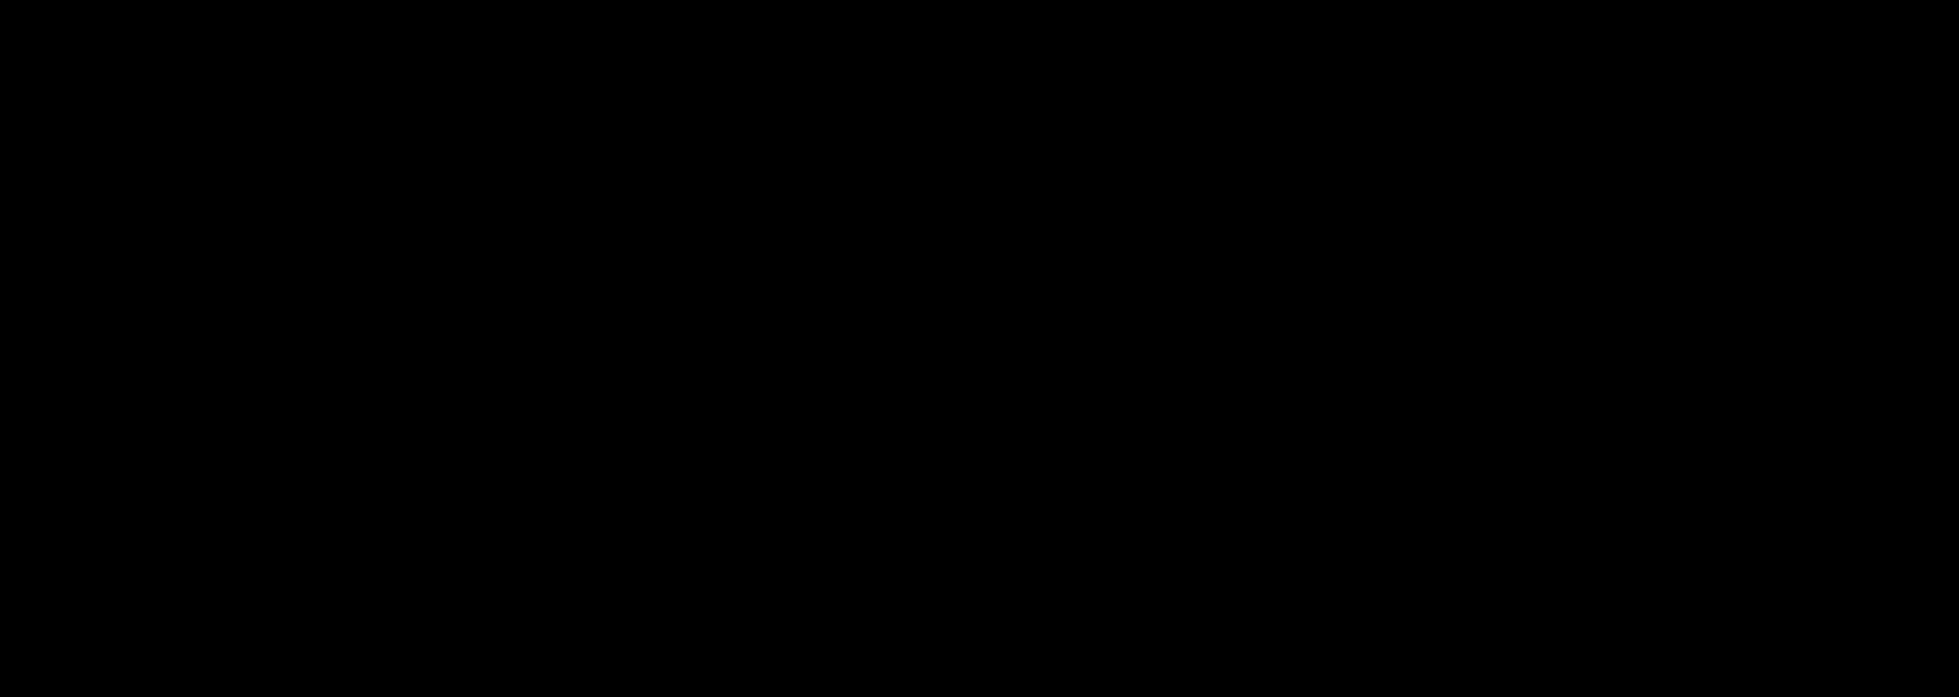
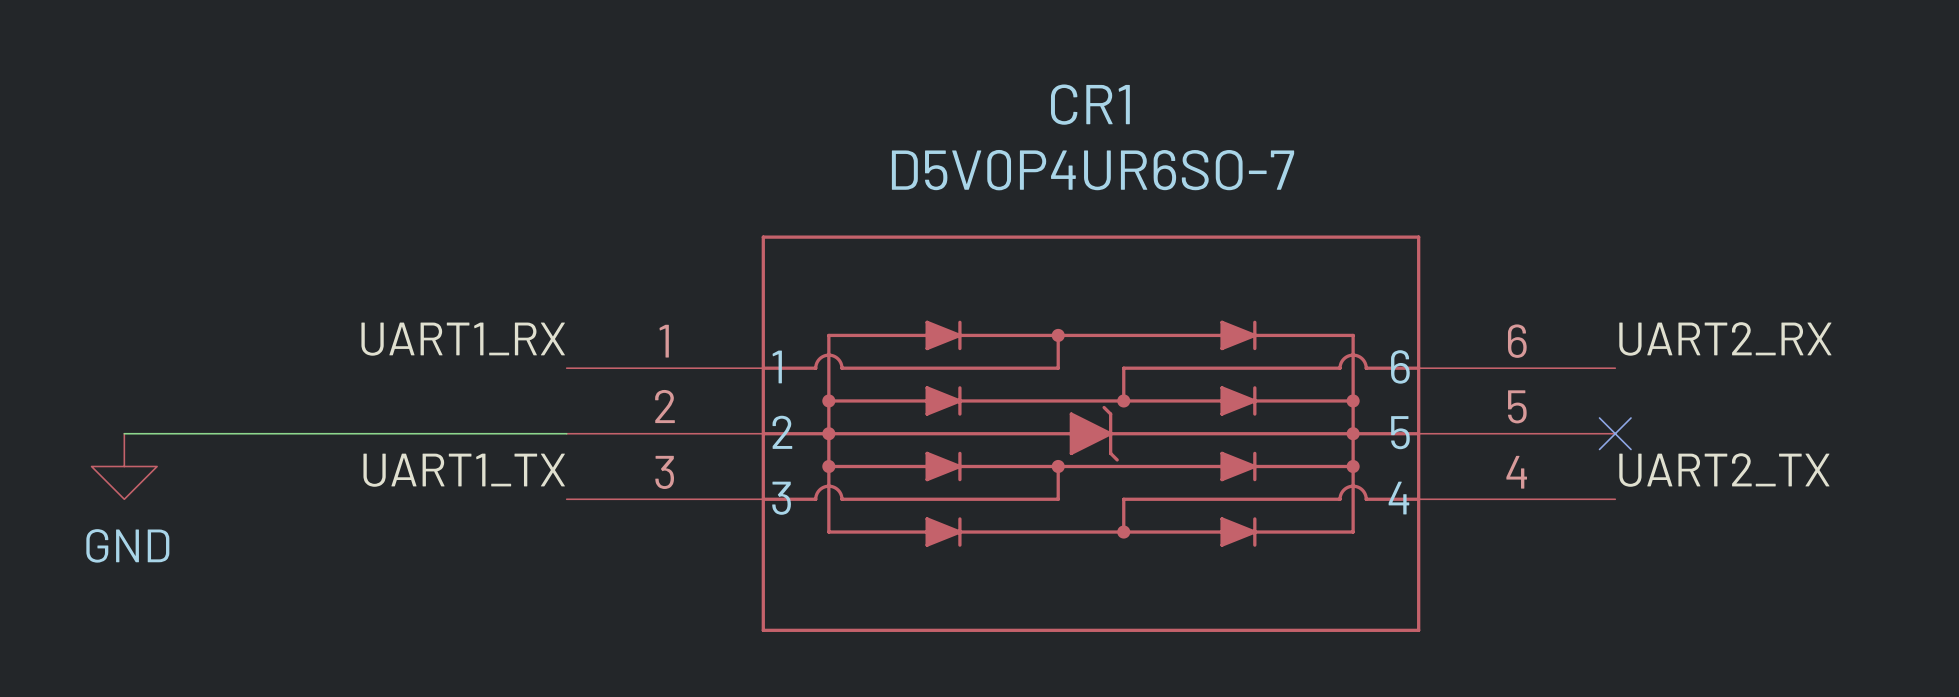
label: none -> UART1_RX (463, 339)
label: none -> UART2_RX (1725, 338)
wire: none -> (124, 433) (566, 433)
CR1: none -> D5V0P4UR6SO-7 (1090, 433)
no-connect mark: none -> (1615, 433)
power symbol: none -> GND (124, 466)
label: none -> UART1_TX (464, 470)
label: none -> UART2_TX (1724, 470)

